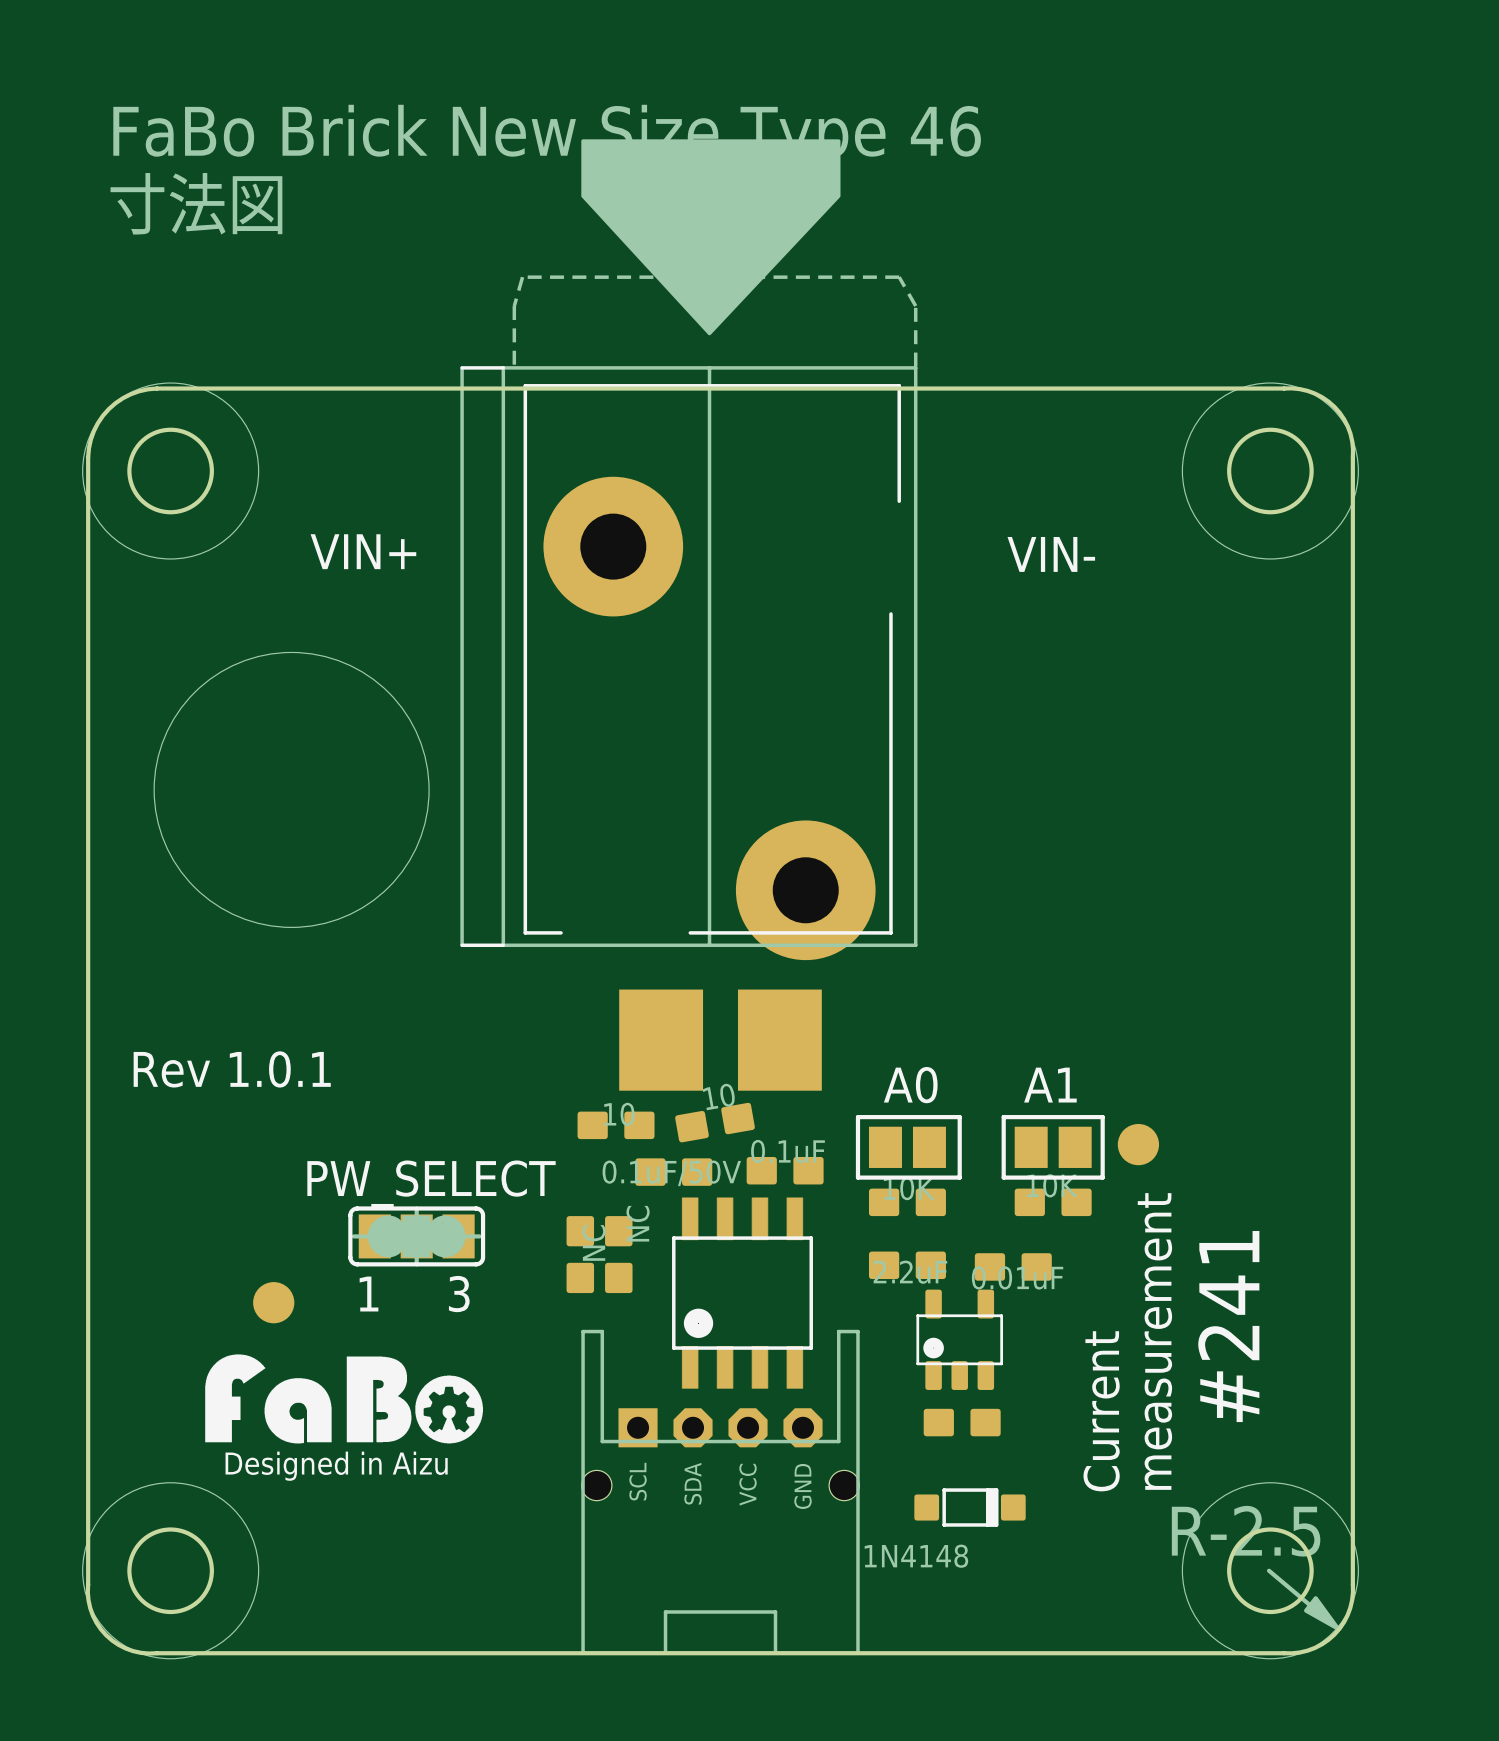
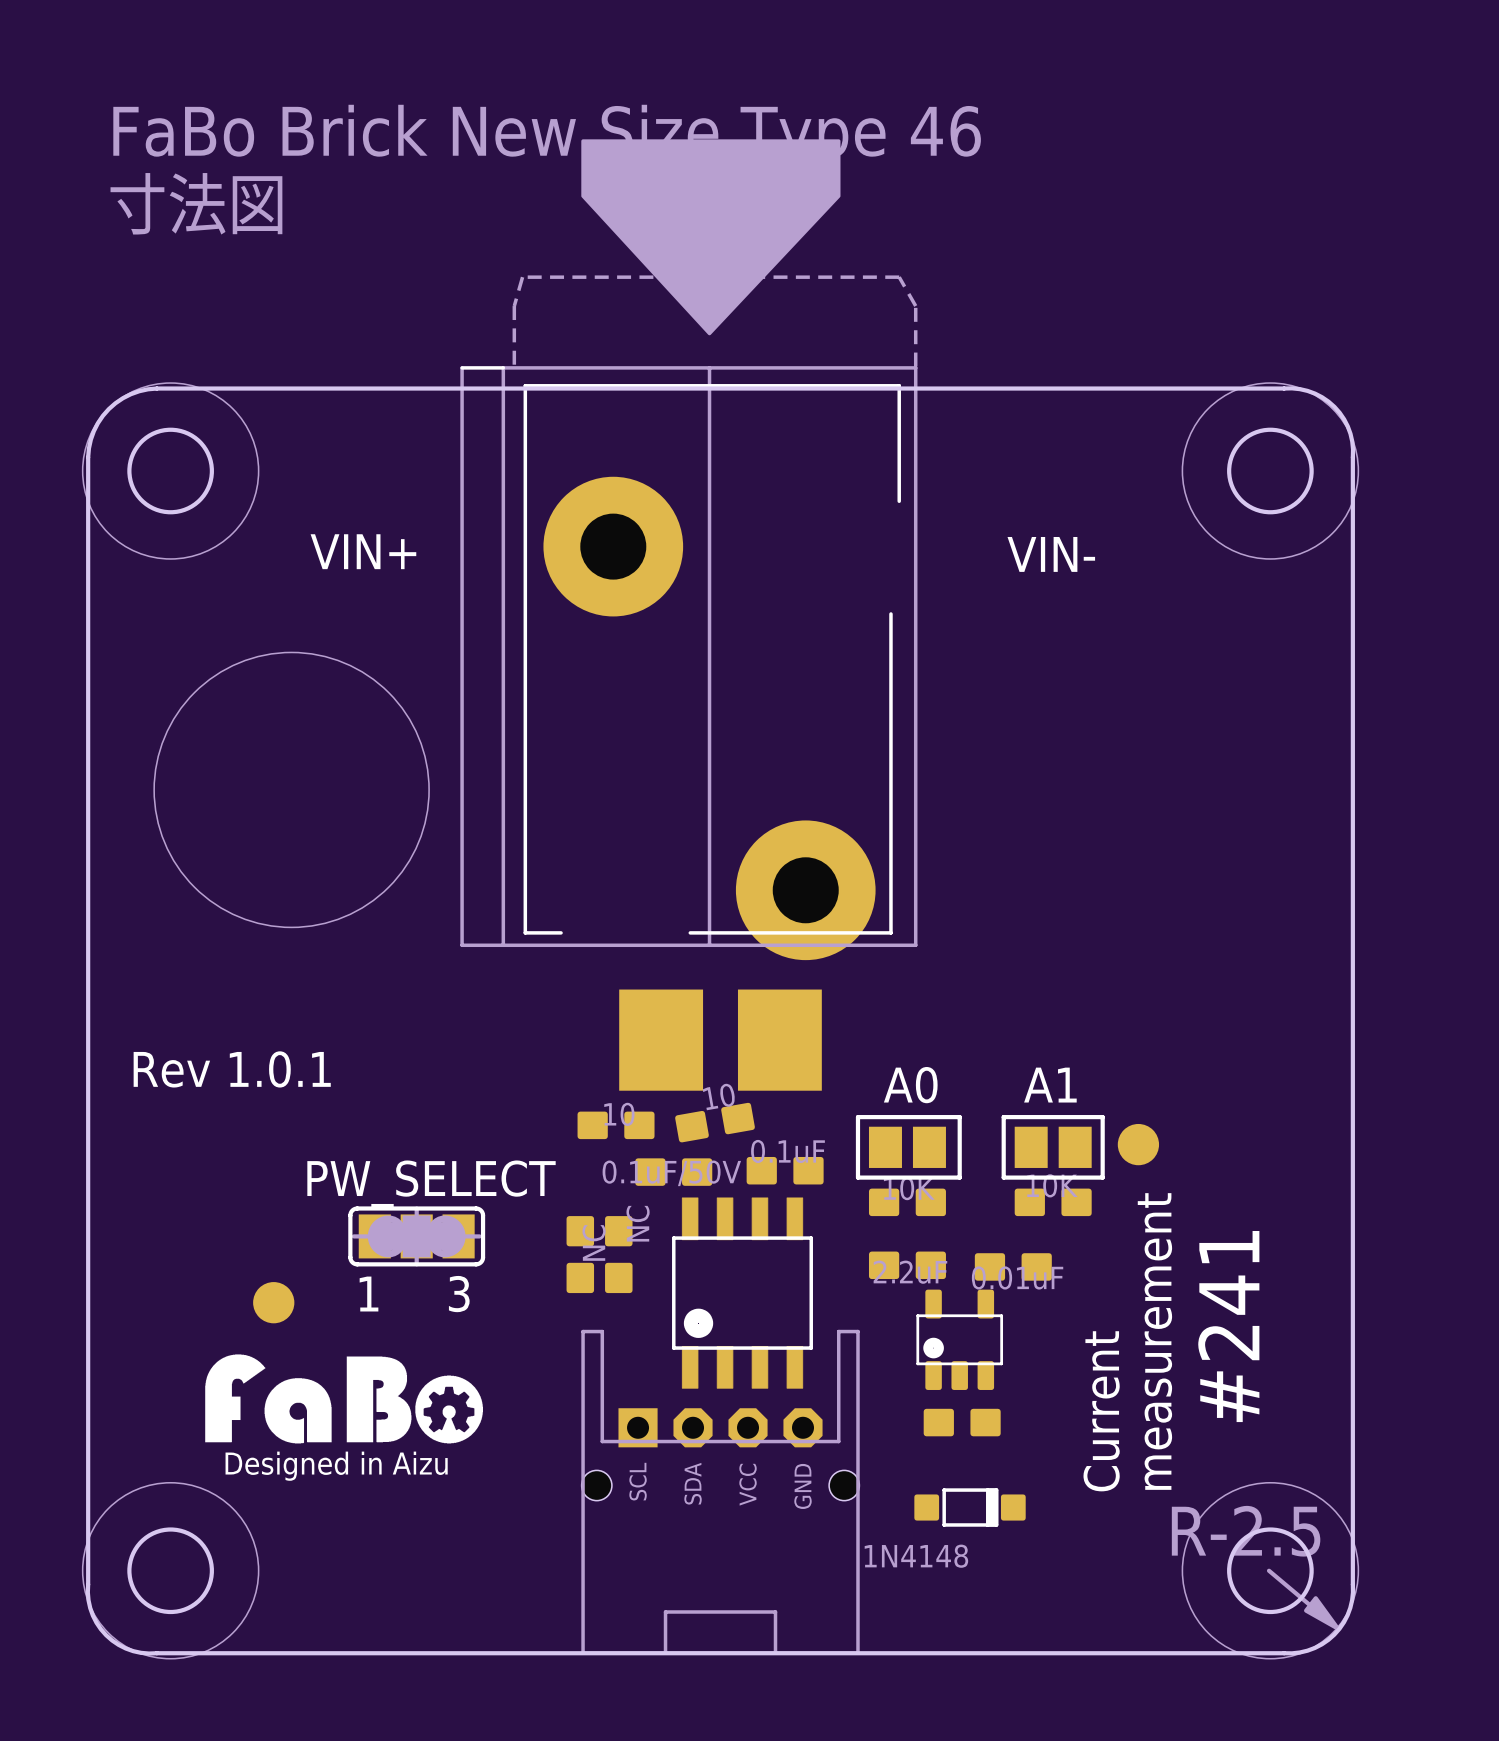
part footprint: [460, 139, 918, 961] -> [460, 139, 918, 961]

